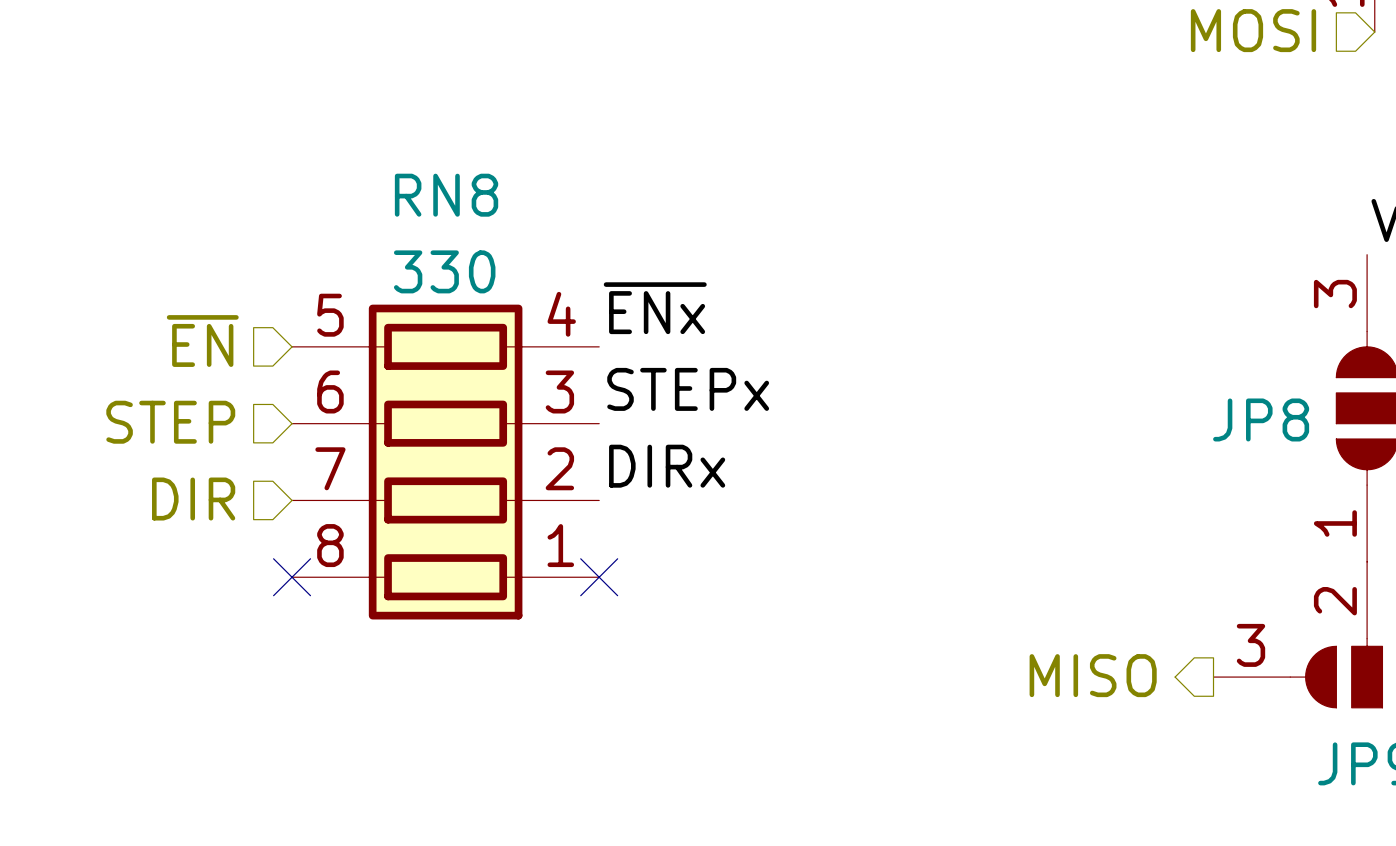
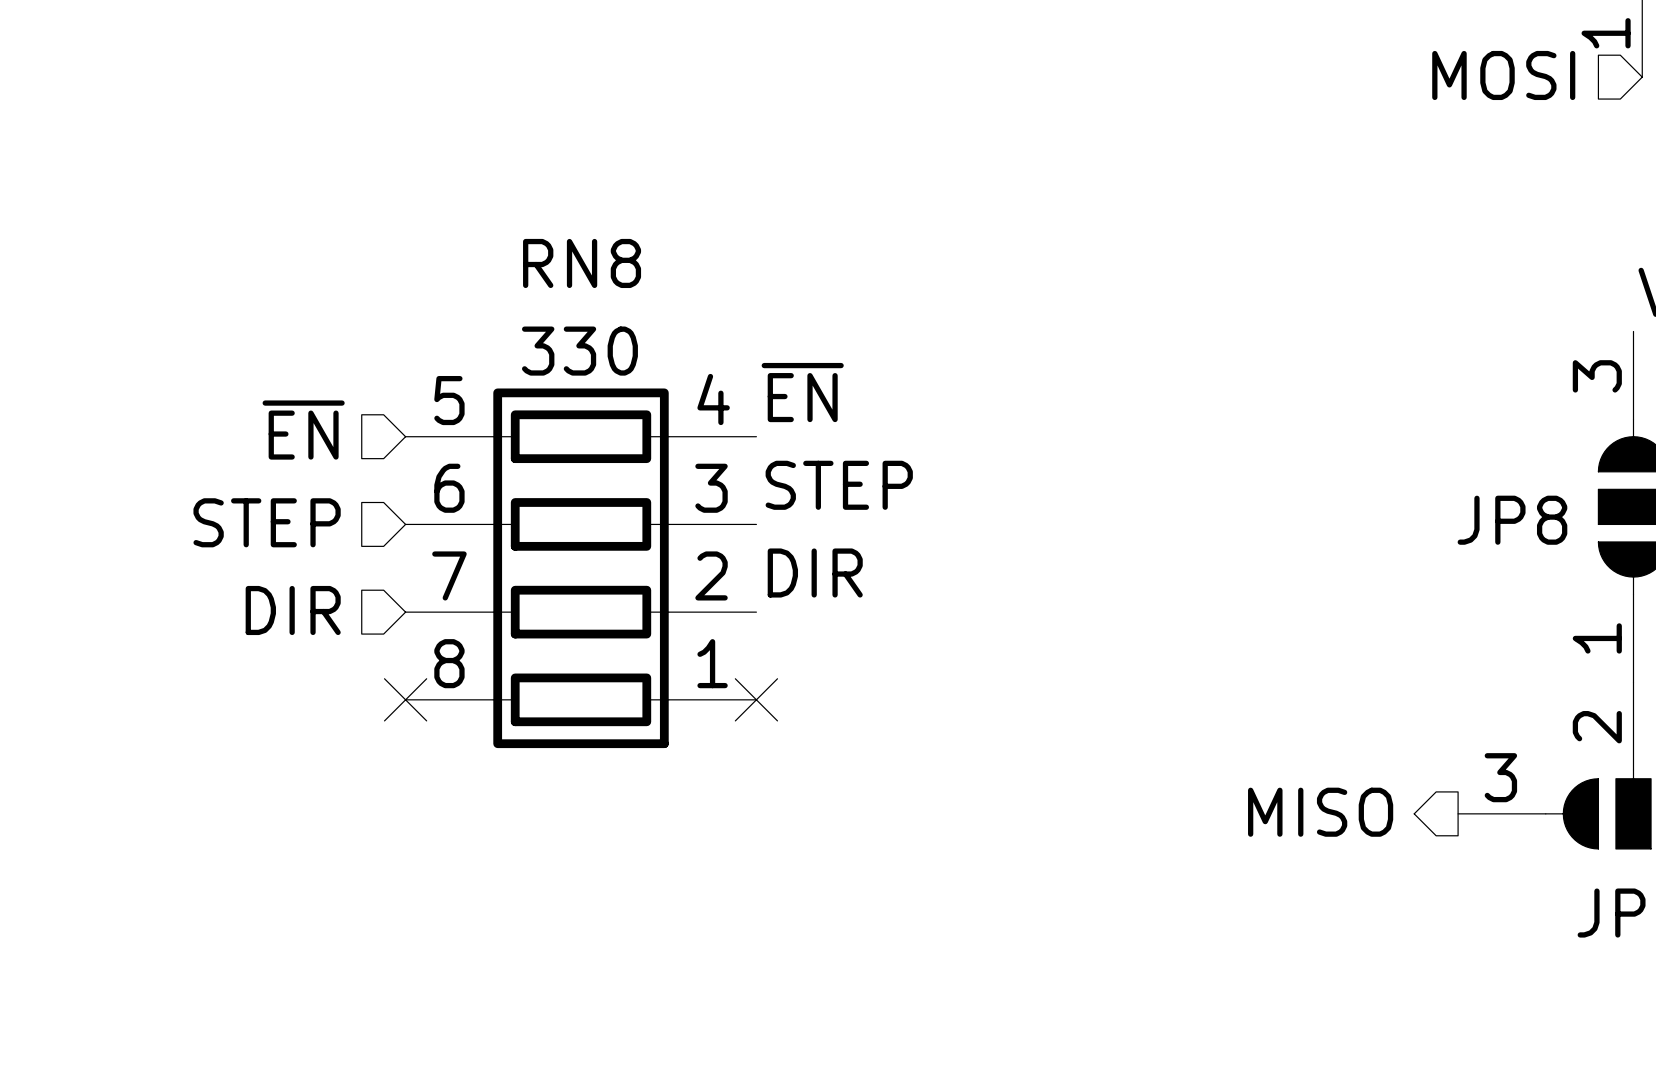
label: ~{ENx} (655, 308) -> ~{EN} (802, 392)
label: STEPx (688, 389) -> STEP (839, 485)
label: DIRx (667, 466) -> DIR (815, 573)

